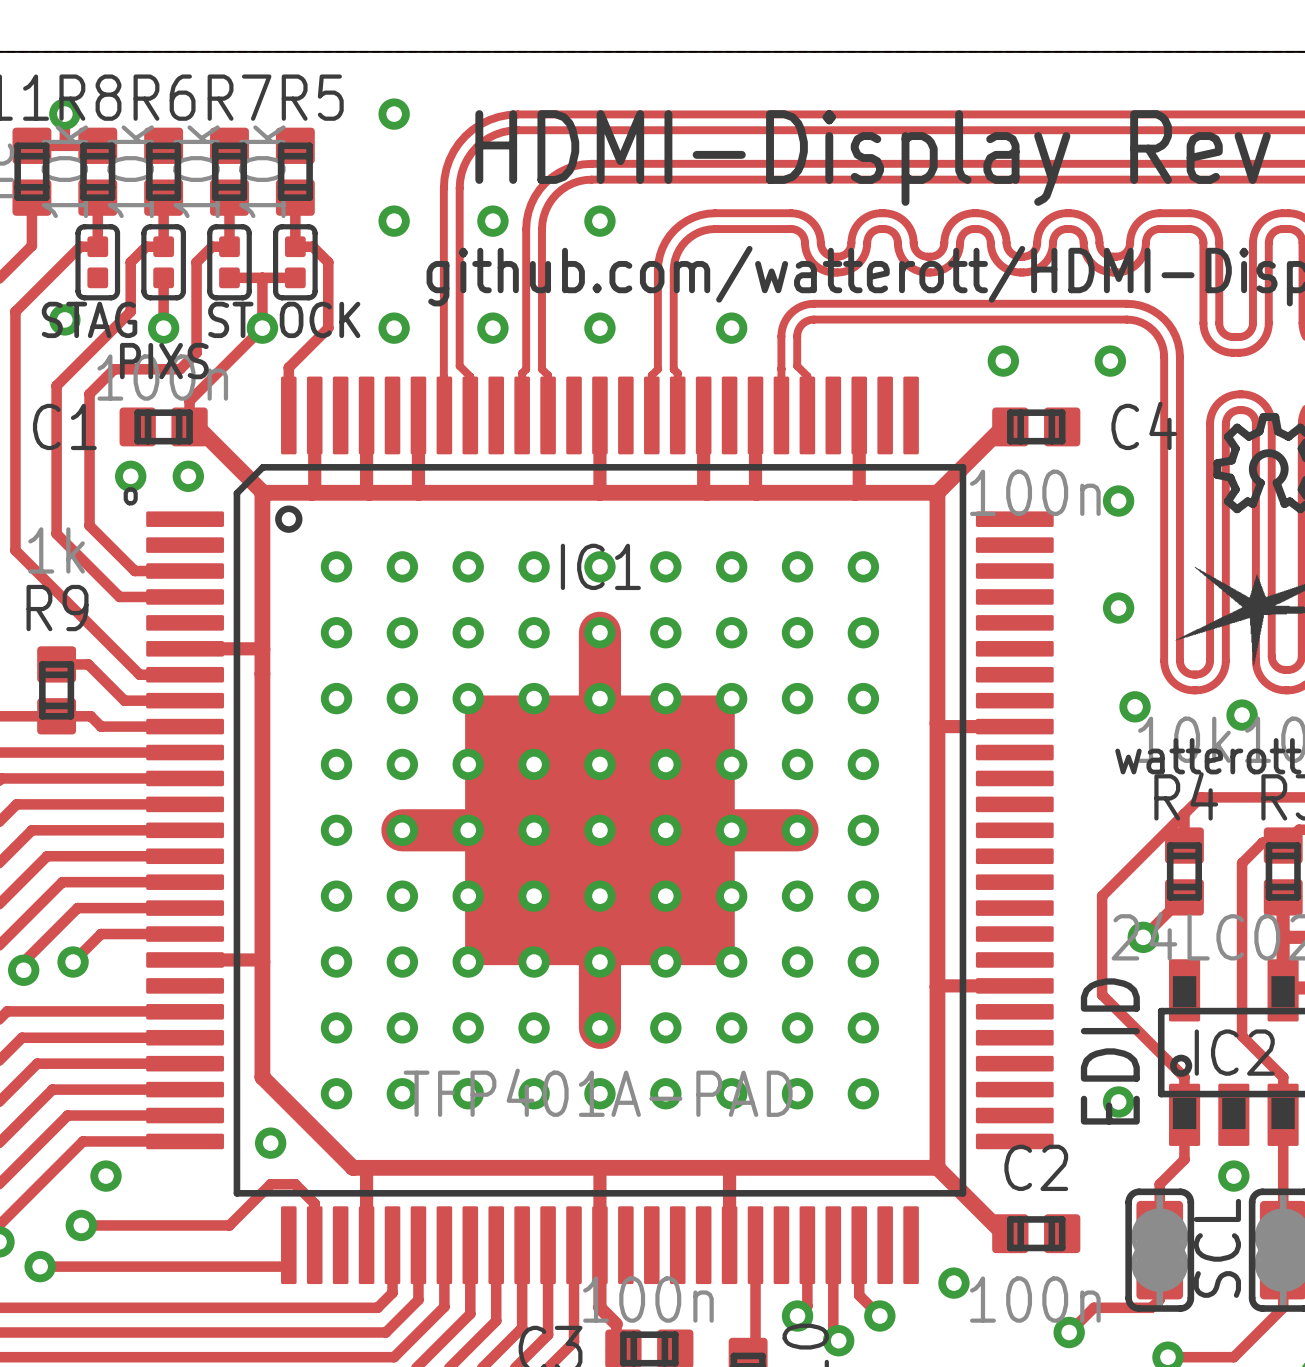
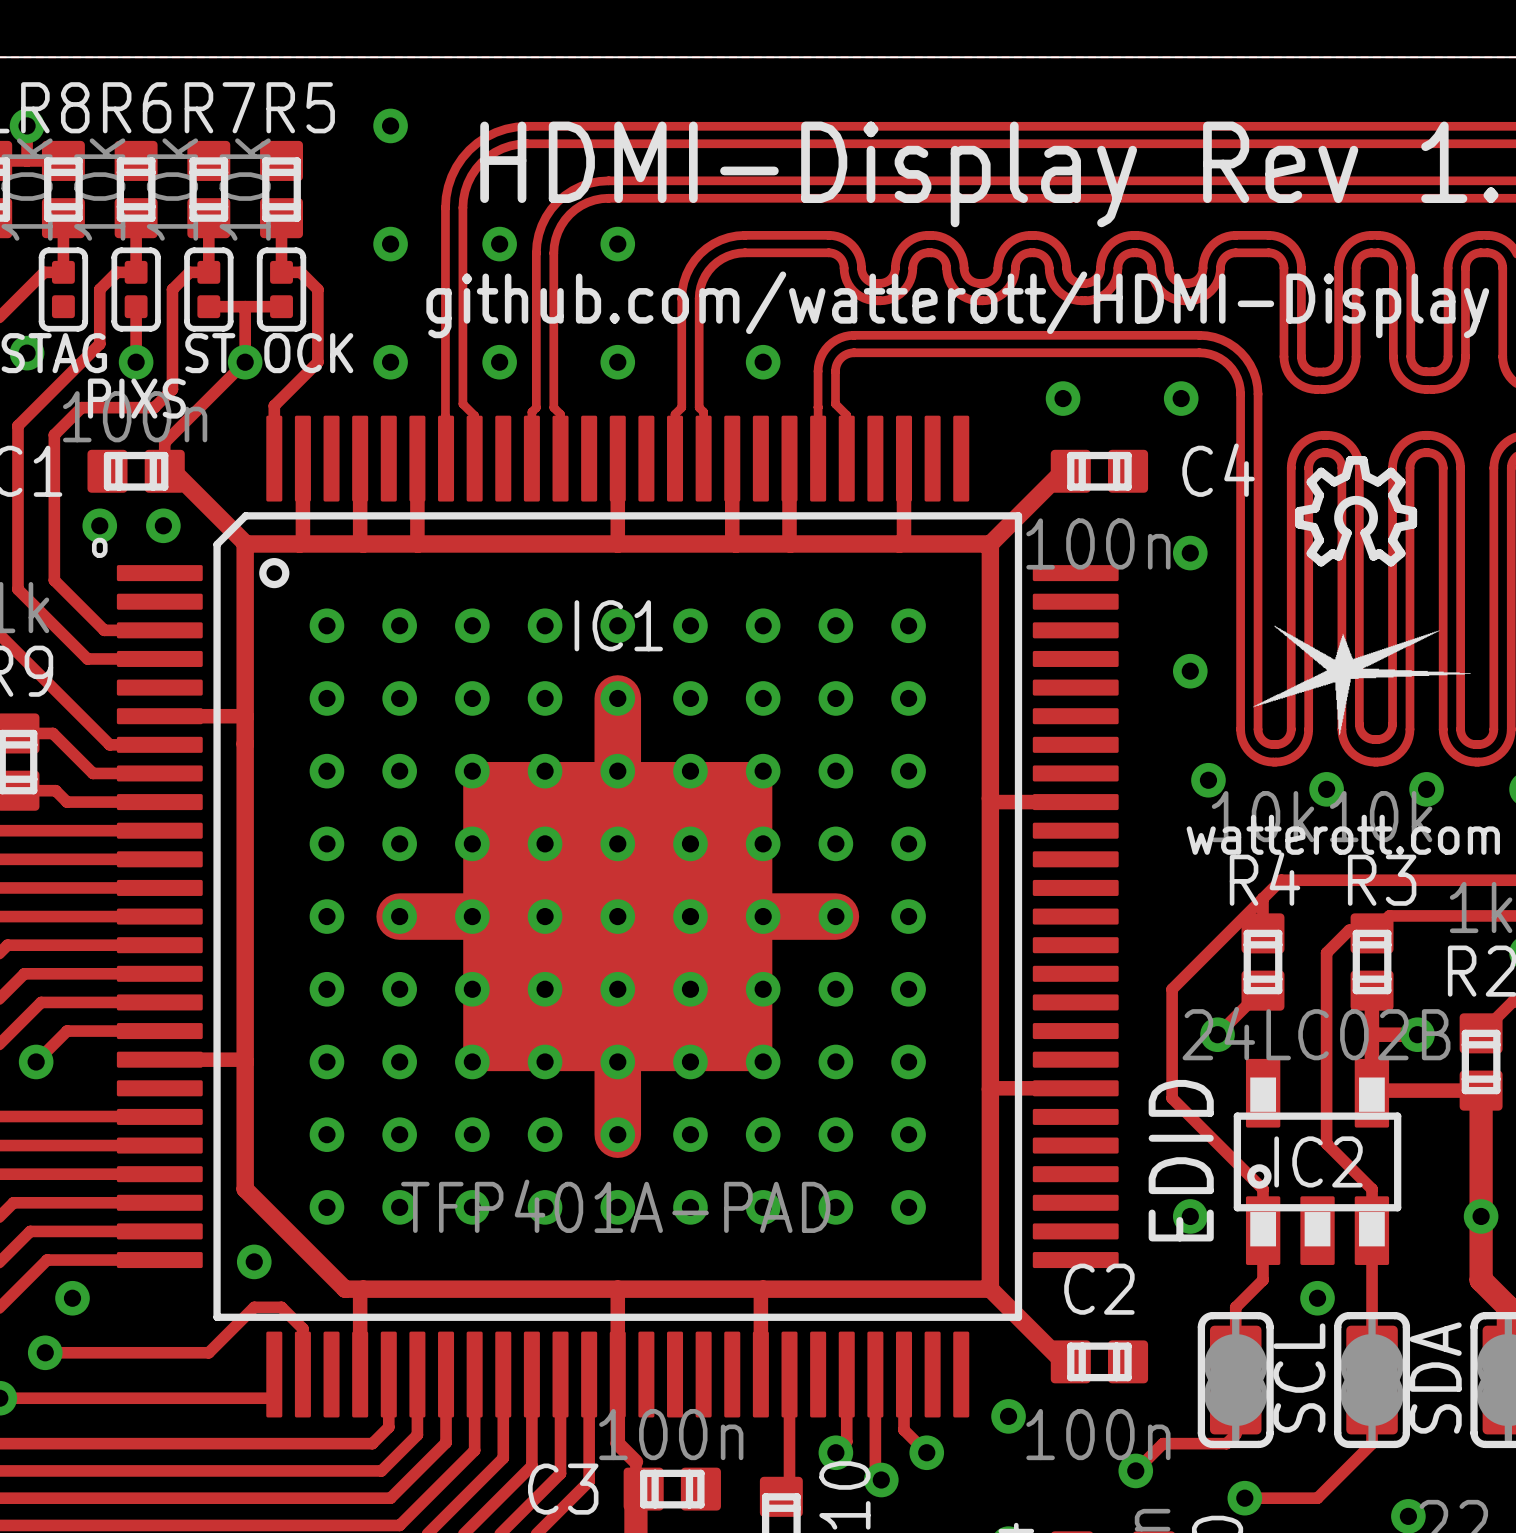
IC1 footprint: [146, 376, 1054, 1285] -> [116, 415, 1119, 1418]

